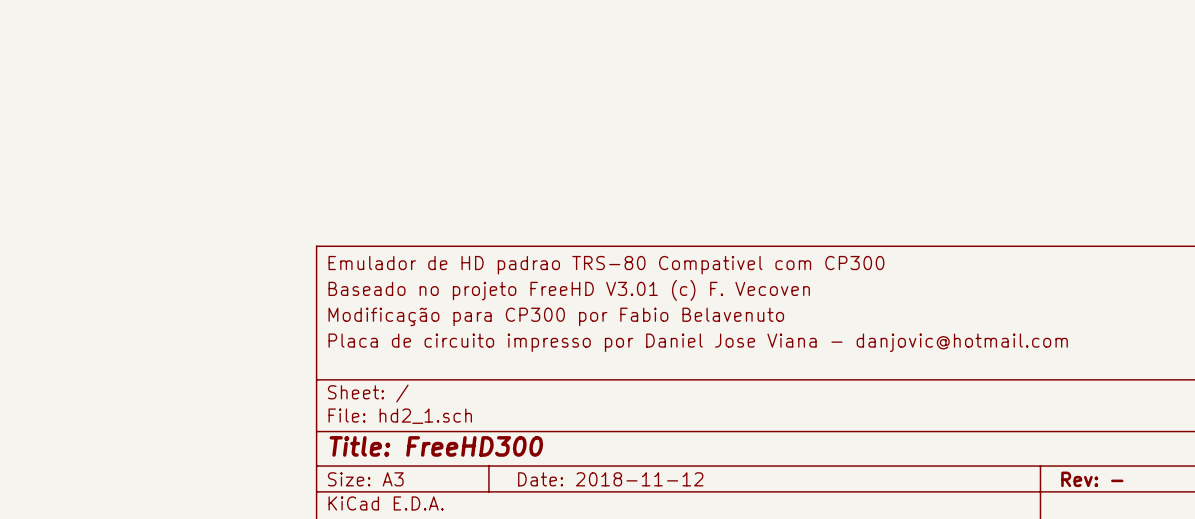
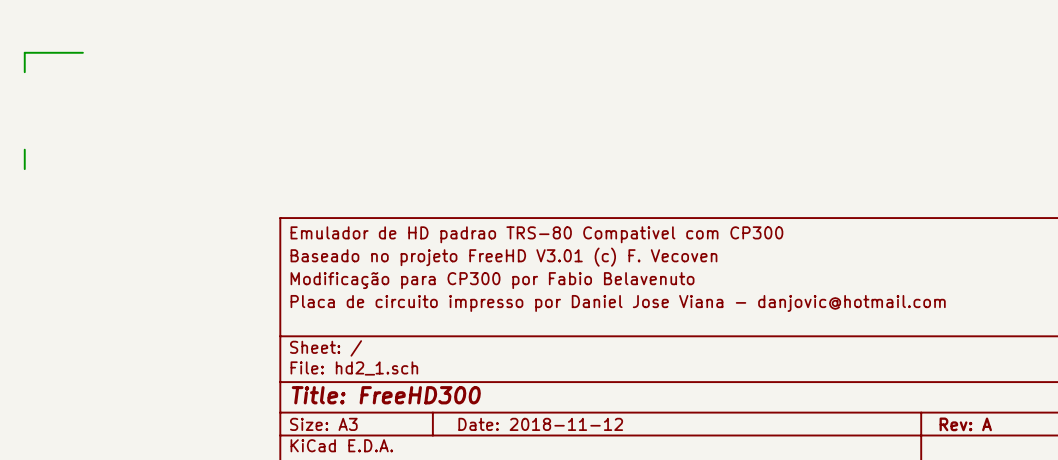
wire: none -> (82, 52) (24, 52) (24, 72)
wire: none -> (24, 149) (24, 169)
title block: Rev: - (1092, 479) -> Rev: A (965, 424)

